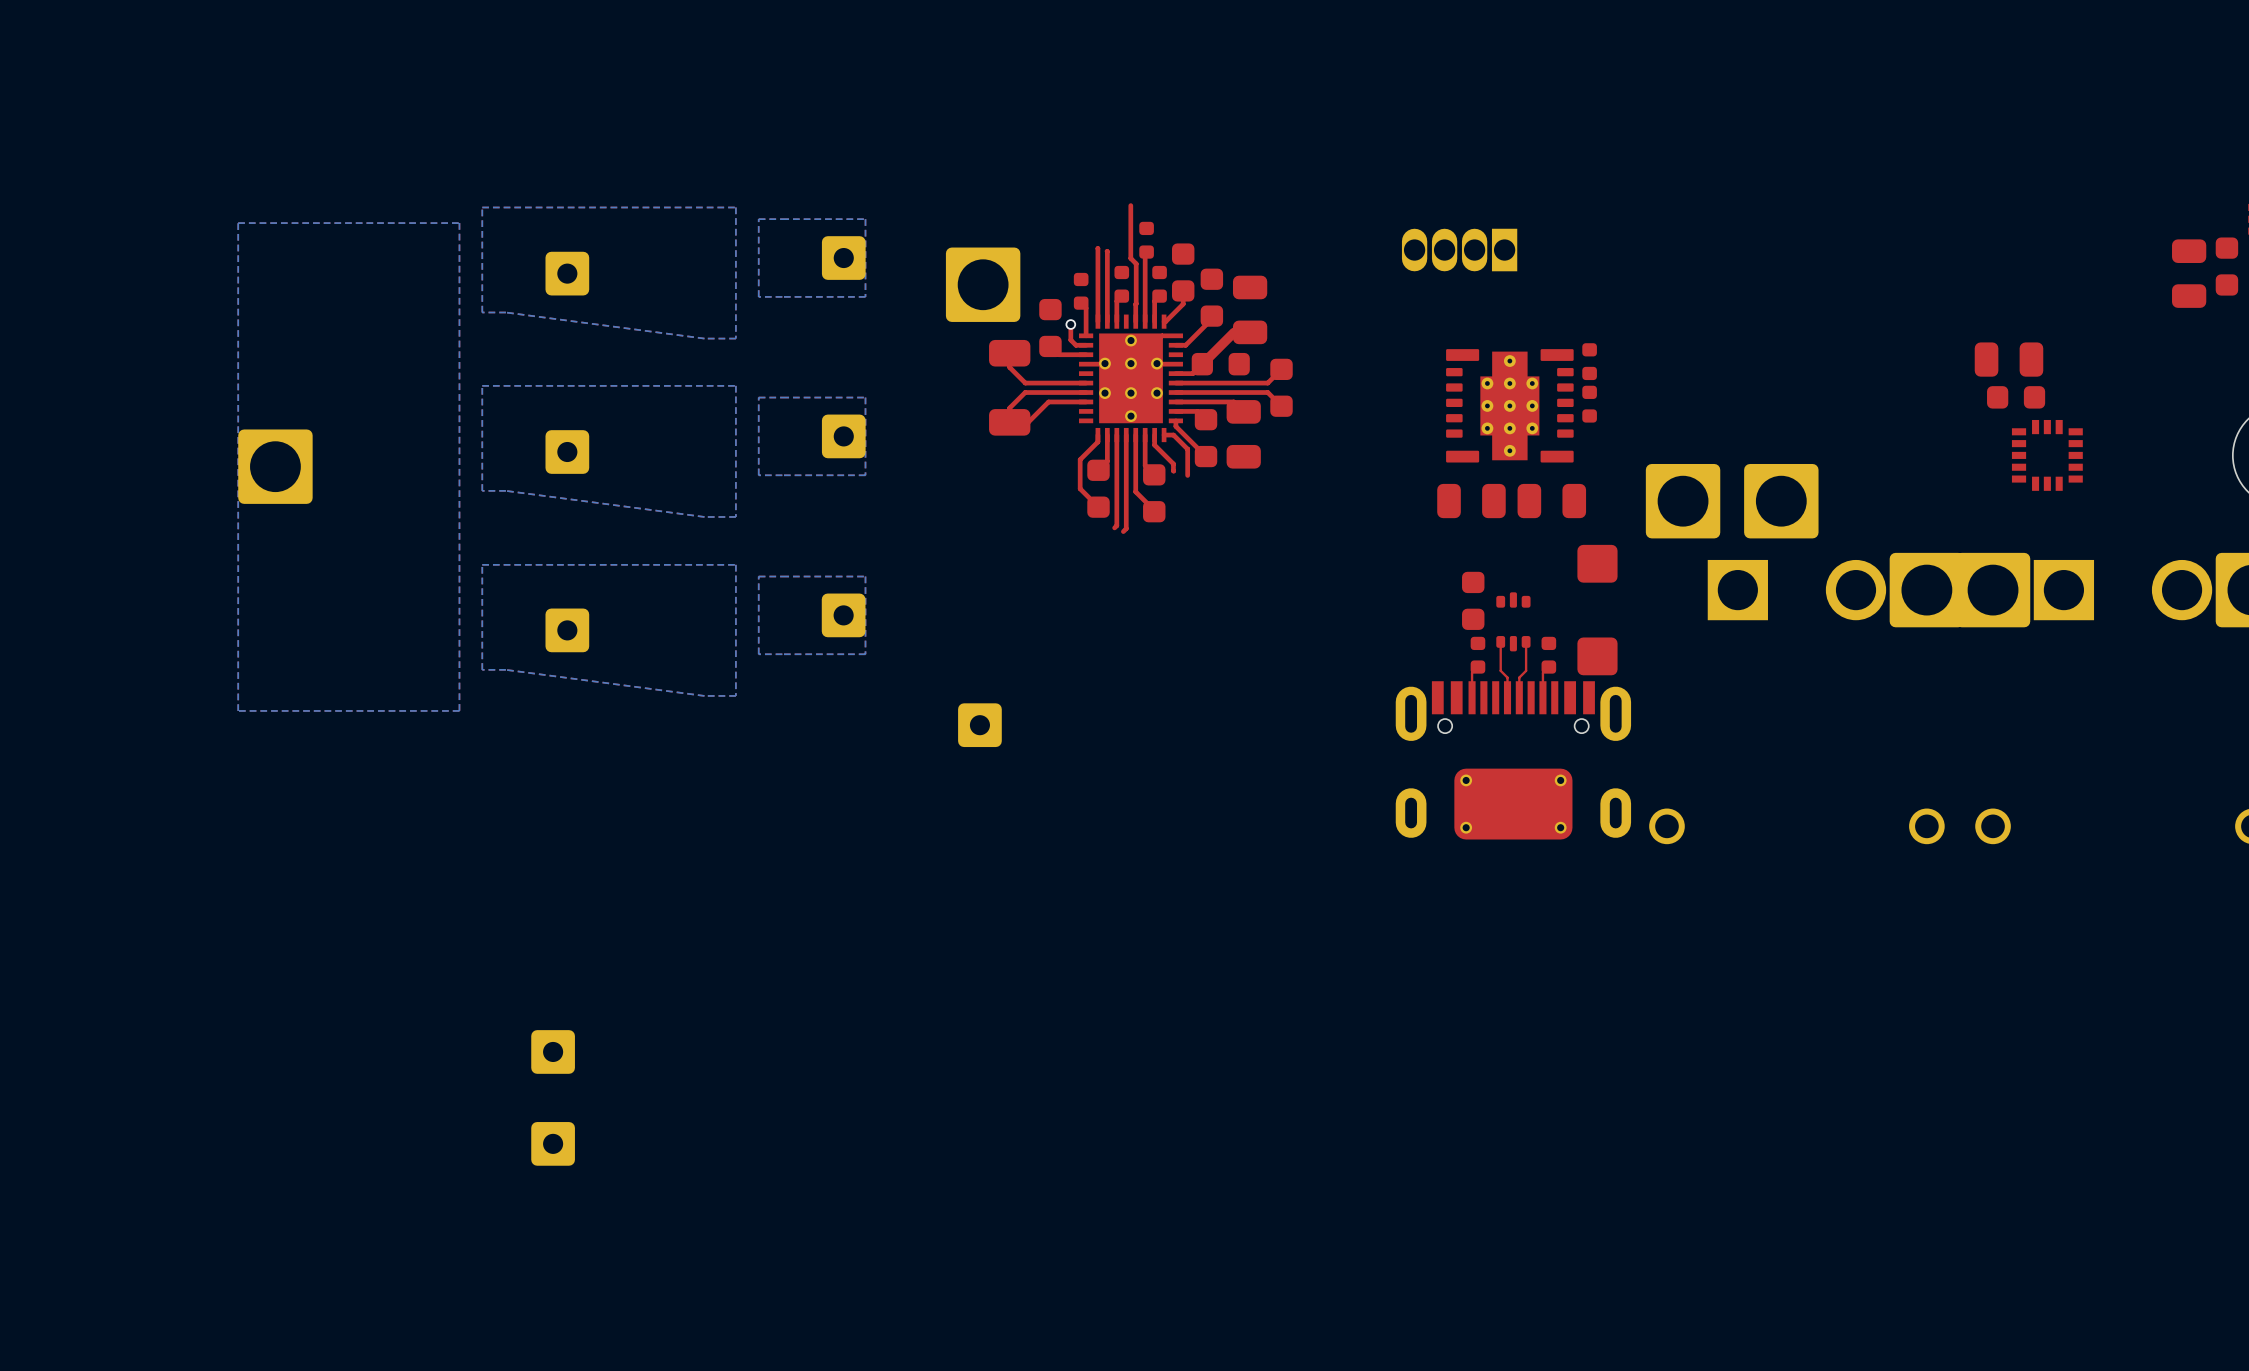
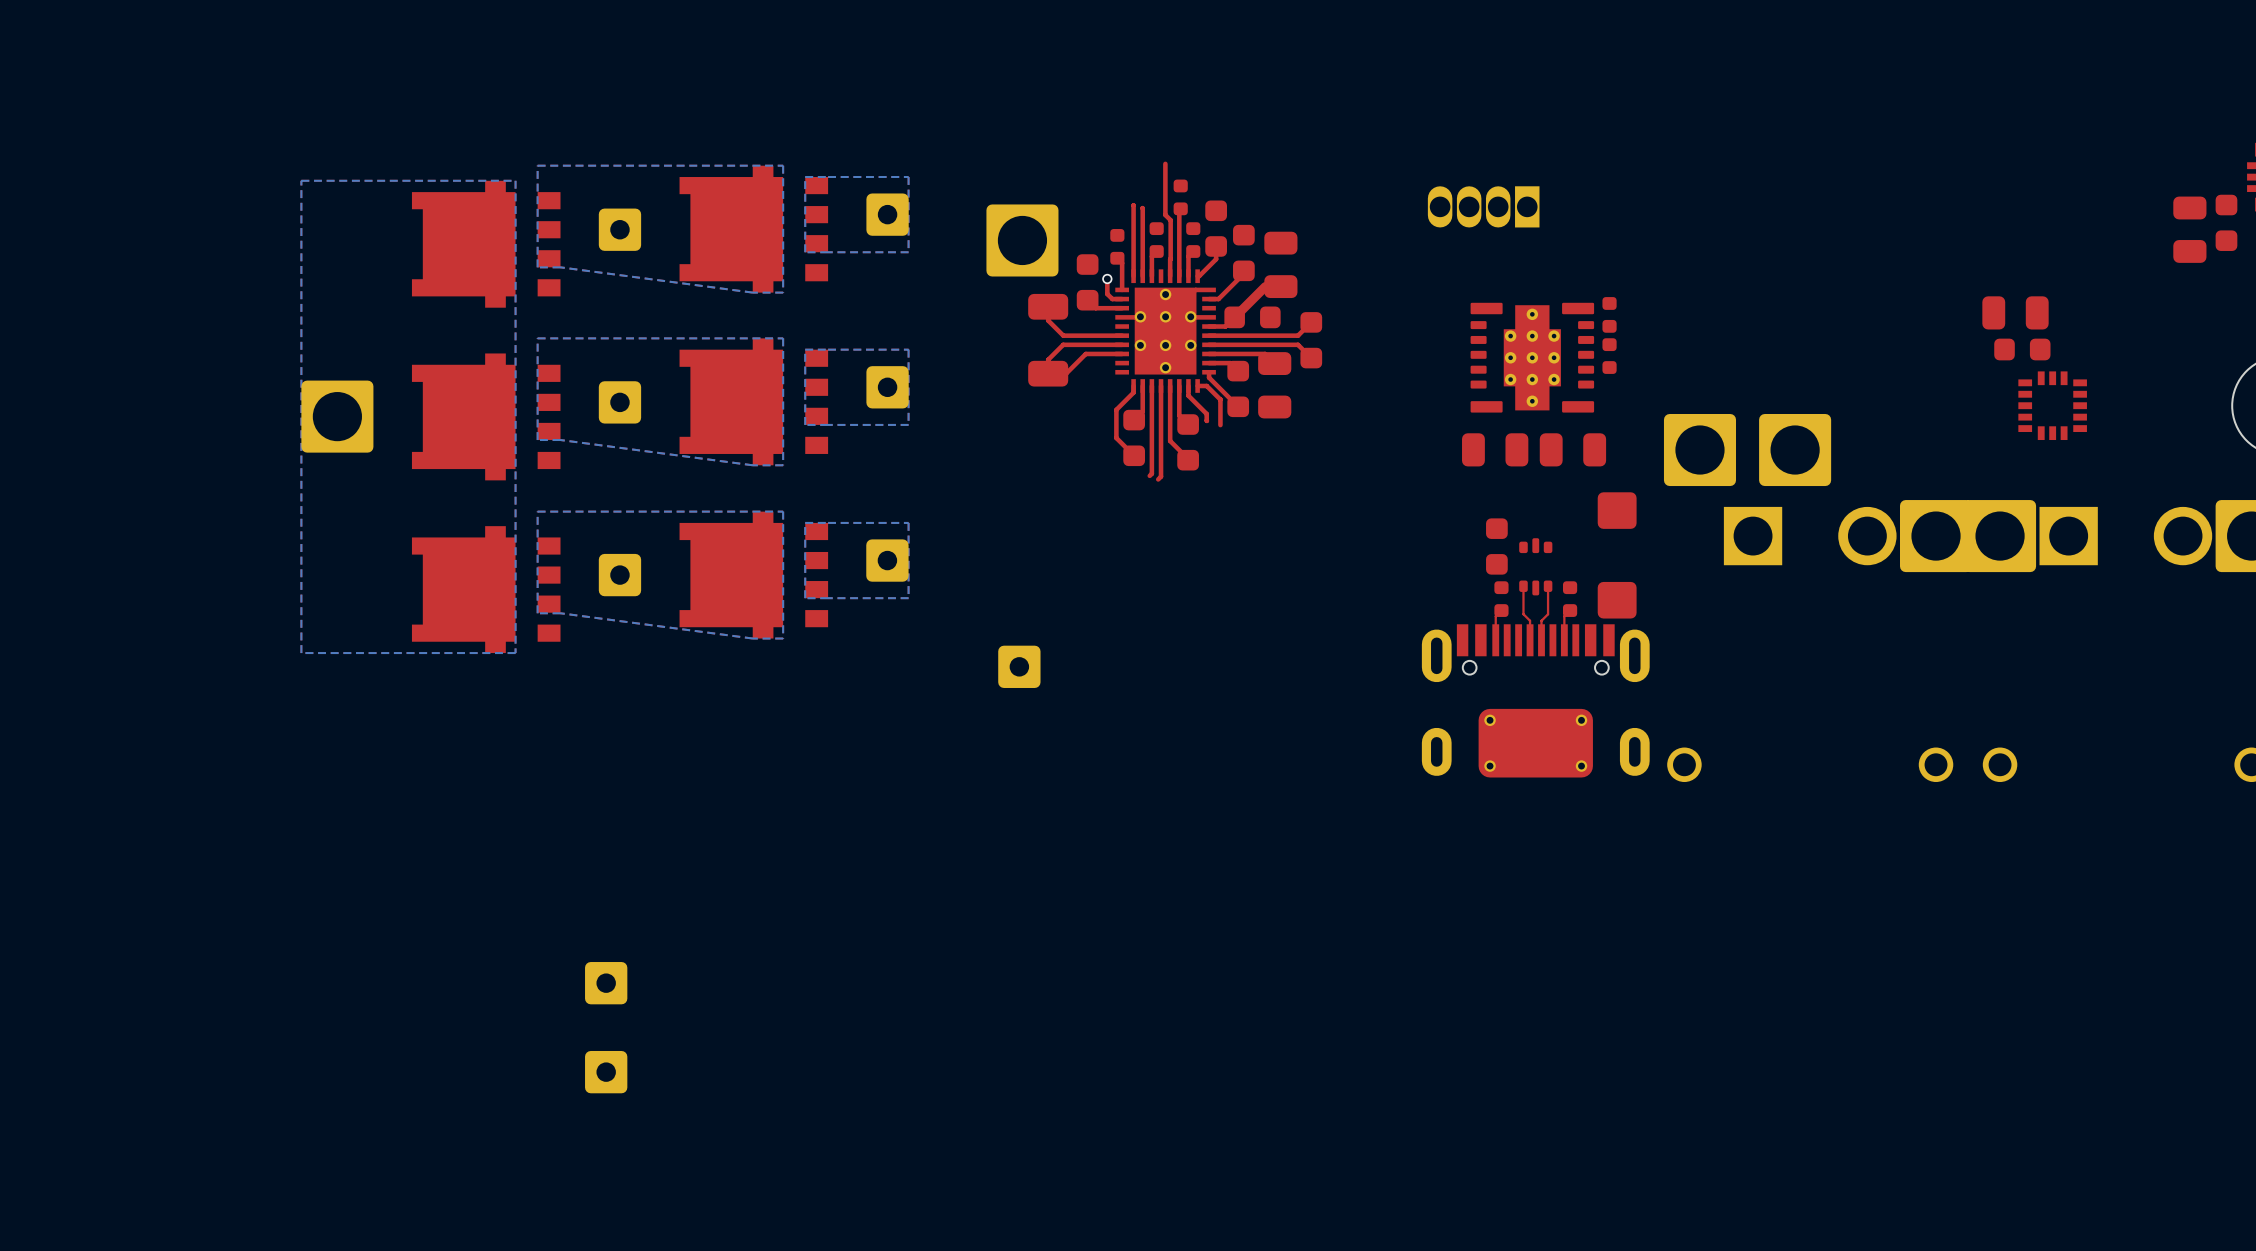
part: none -> (753, 229)
part: none -> (486, 244)
part: none -> (753, 401)
part: none -> (486, 416)
part: none -> (753, 575)
part: none -> (486, 589)

